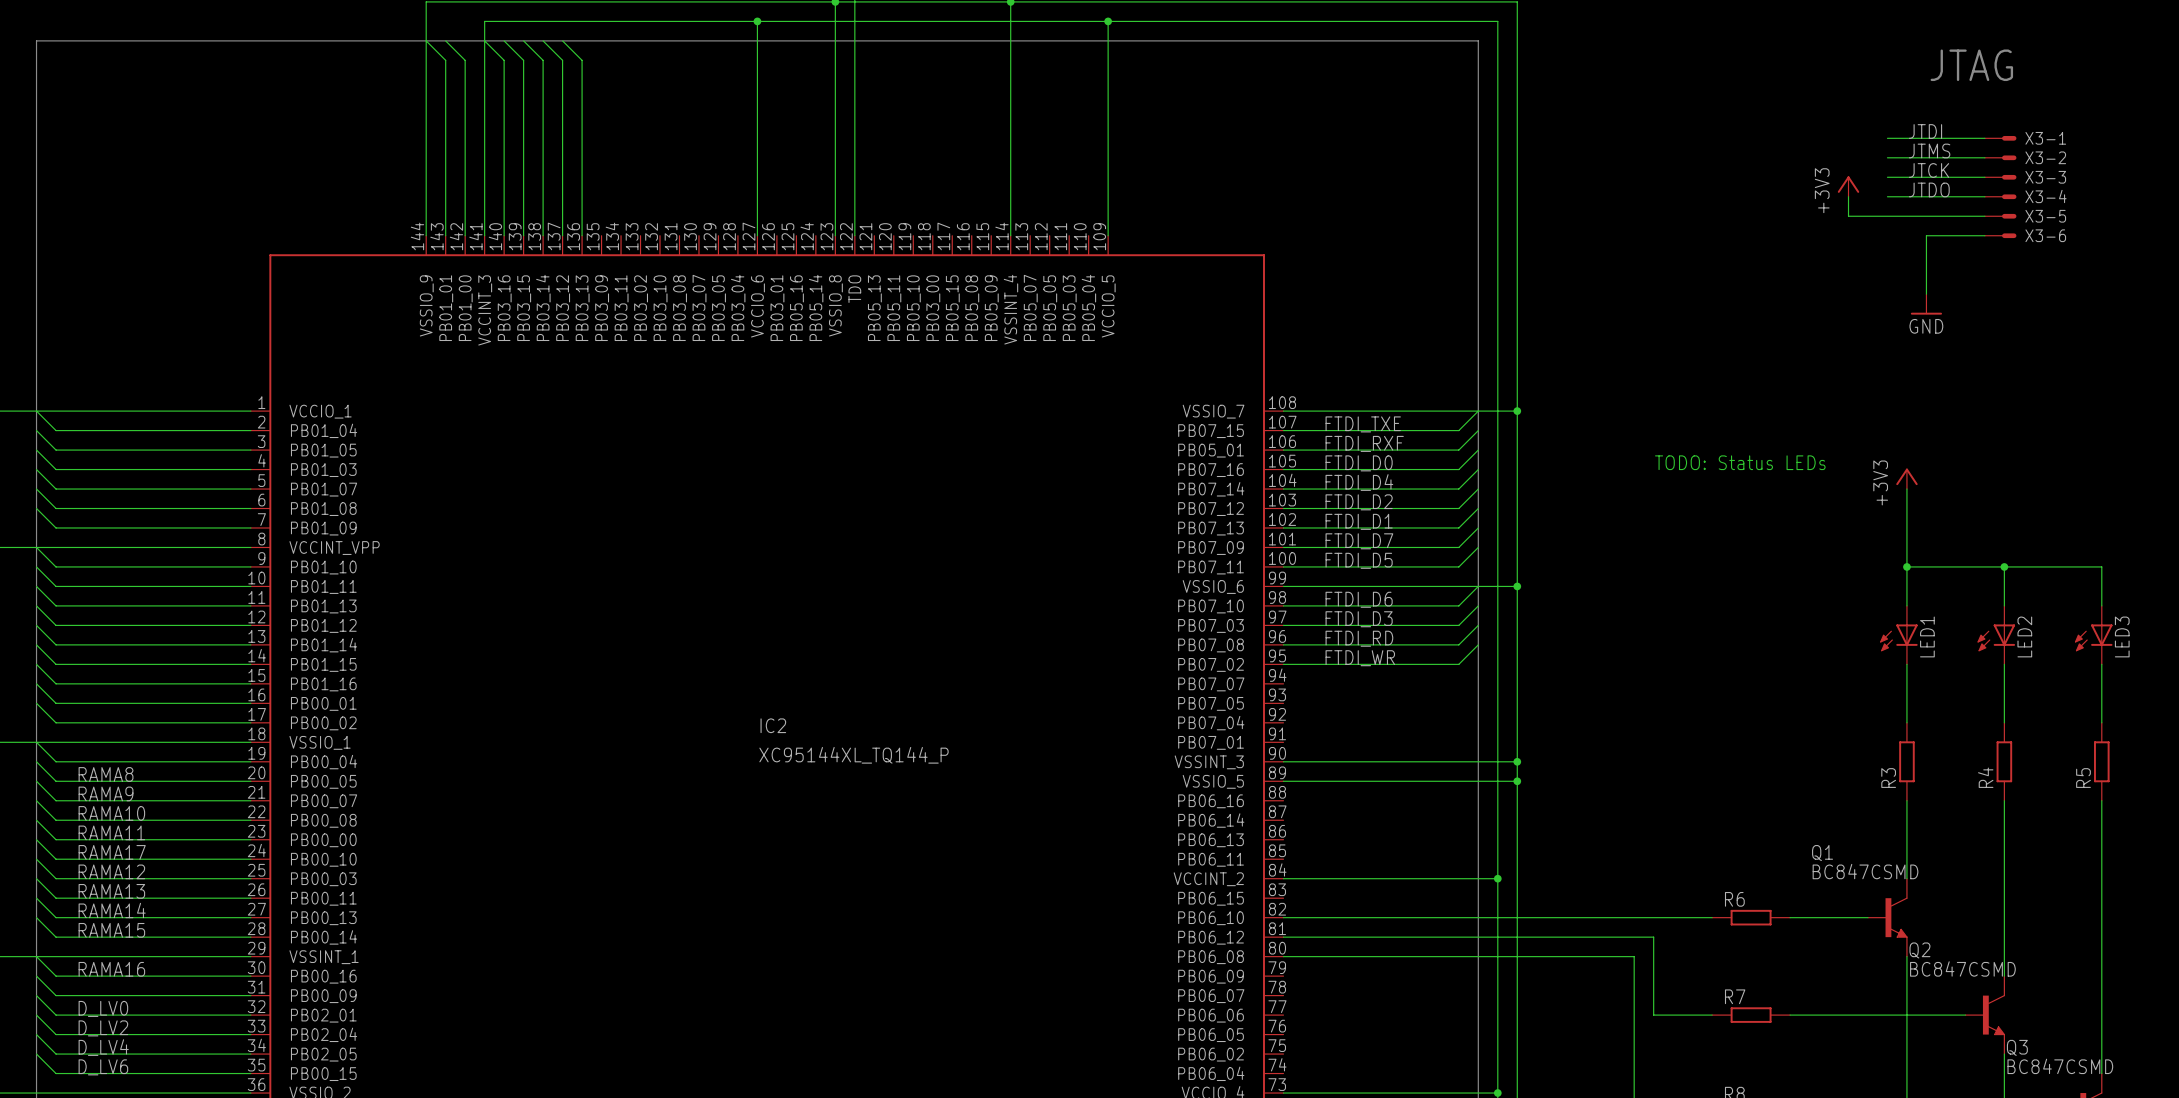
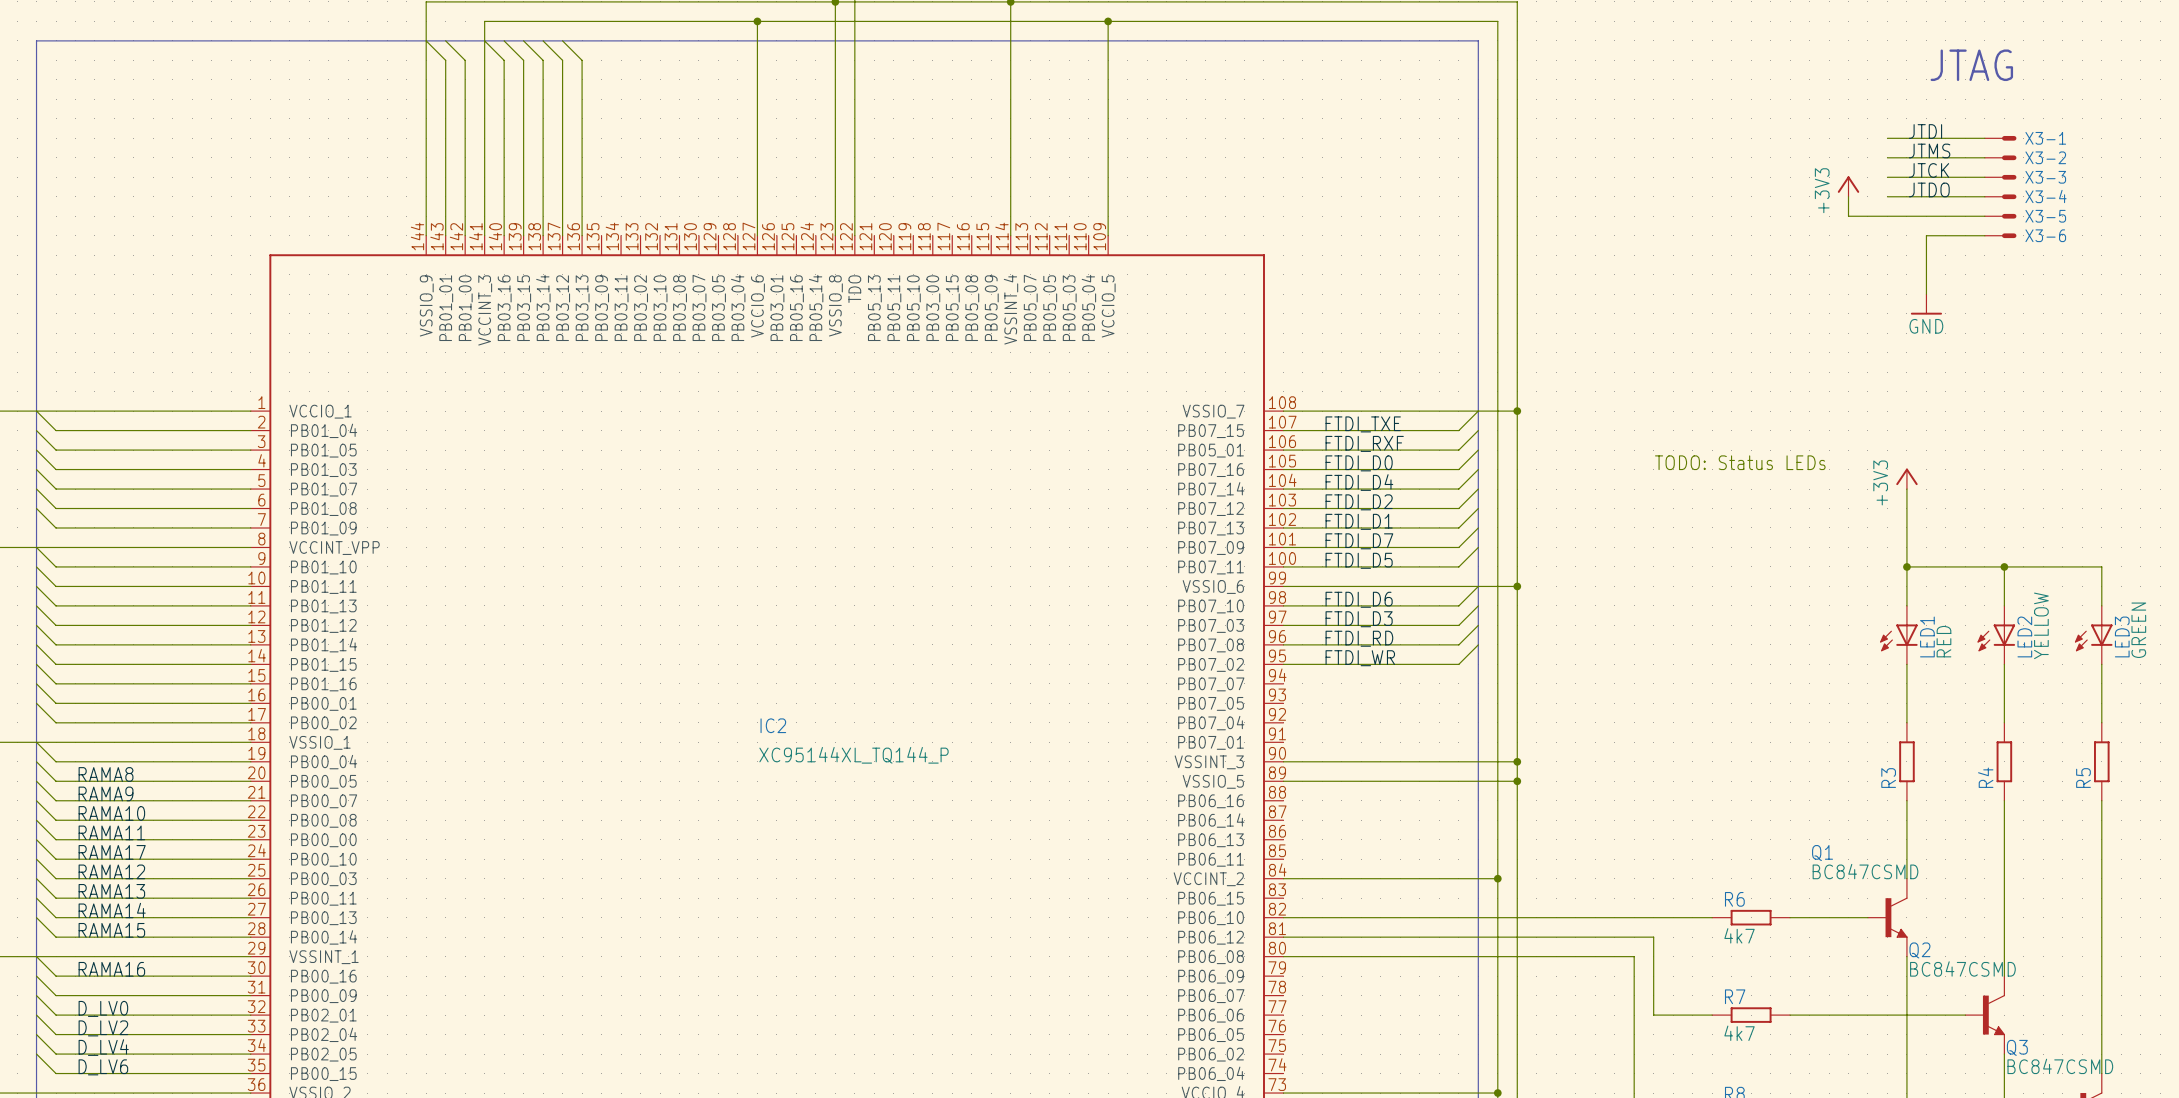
LED2 value: none -> YELLOW (2041, 625)
LED3 value: none -> GREEN (2138, 630)
LED1 value: none -> RED (1943, 641)
R6 value: none -> 4k7 (1739, 935)
R7 value: none -> 4k7 (1739, 1033)

